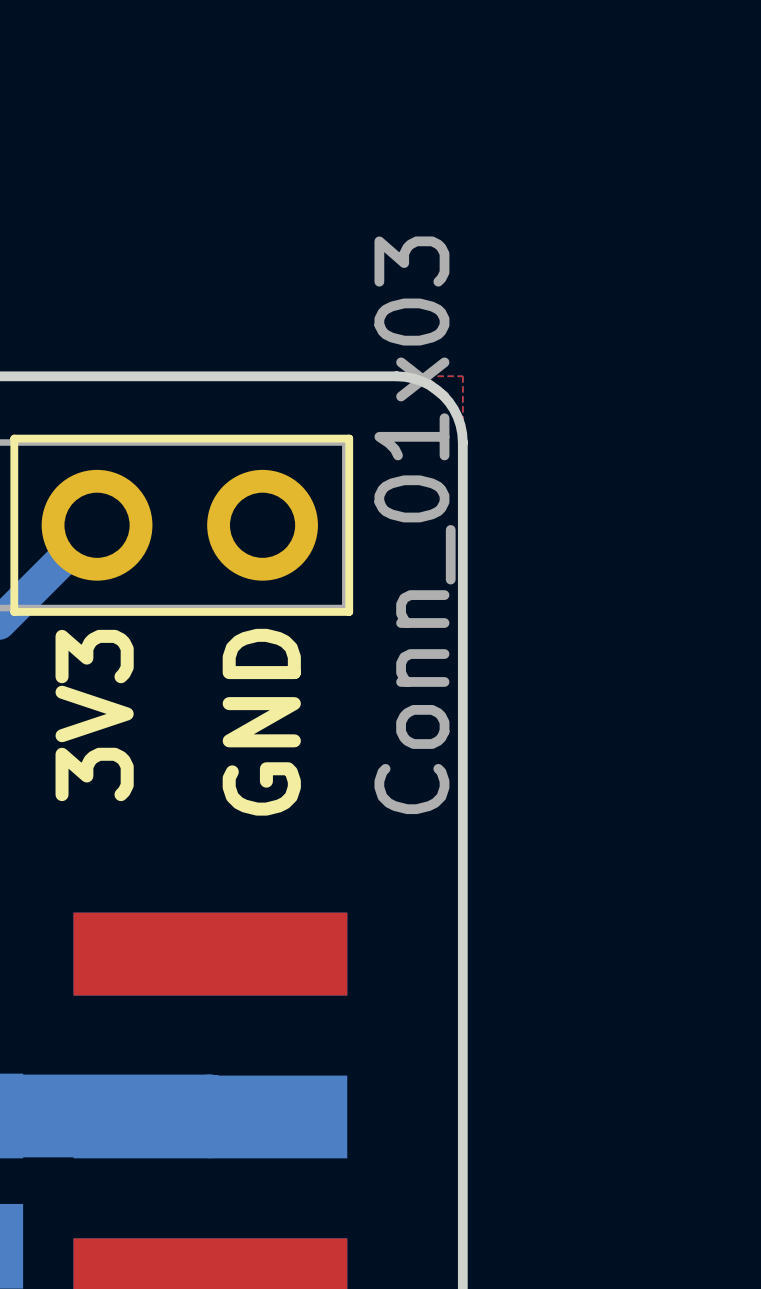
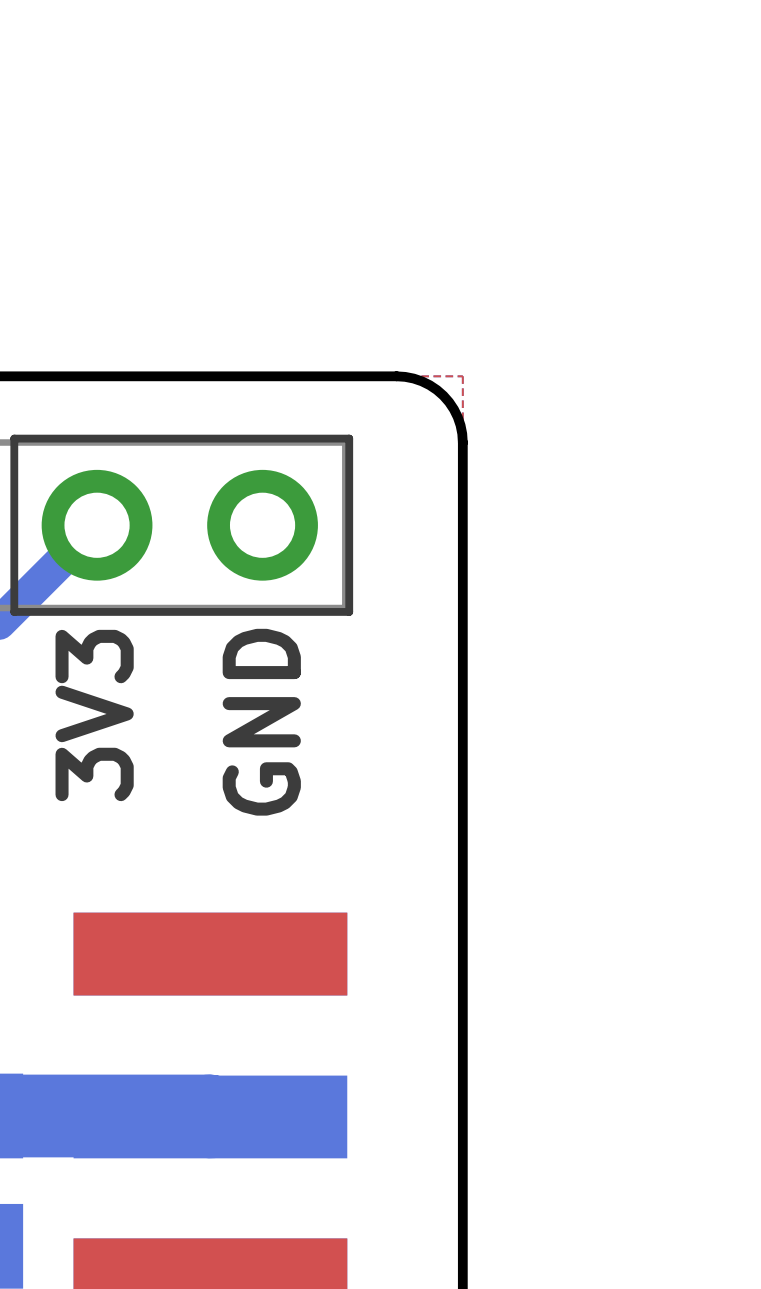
part value: Conn_01x03 (415, 525) -> none

